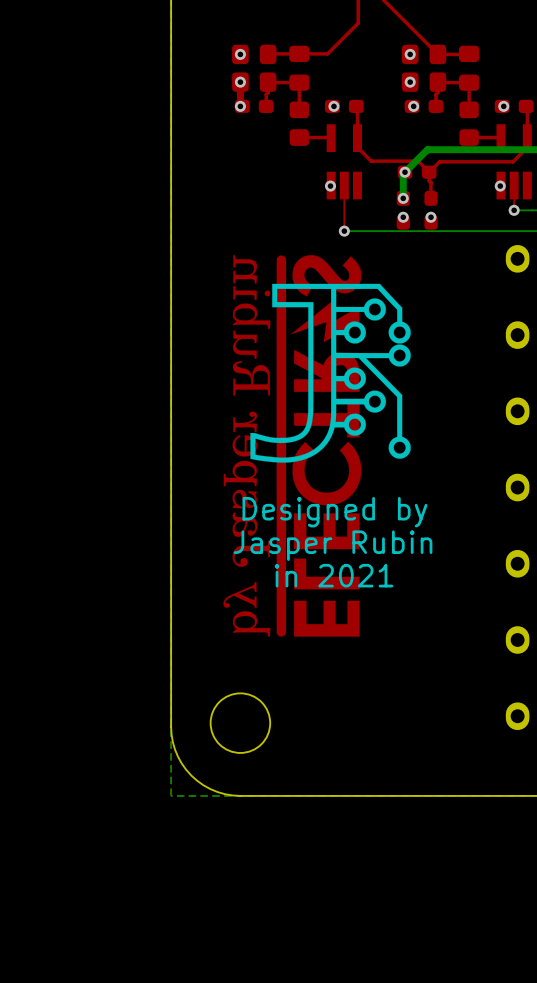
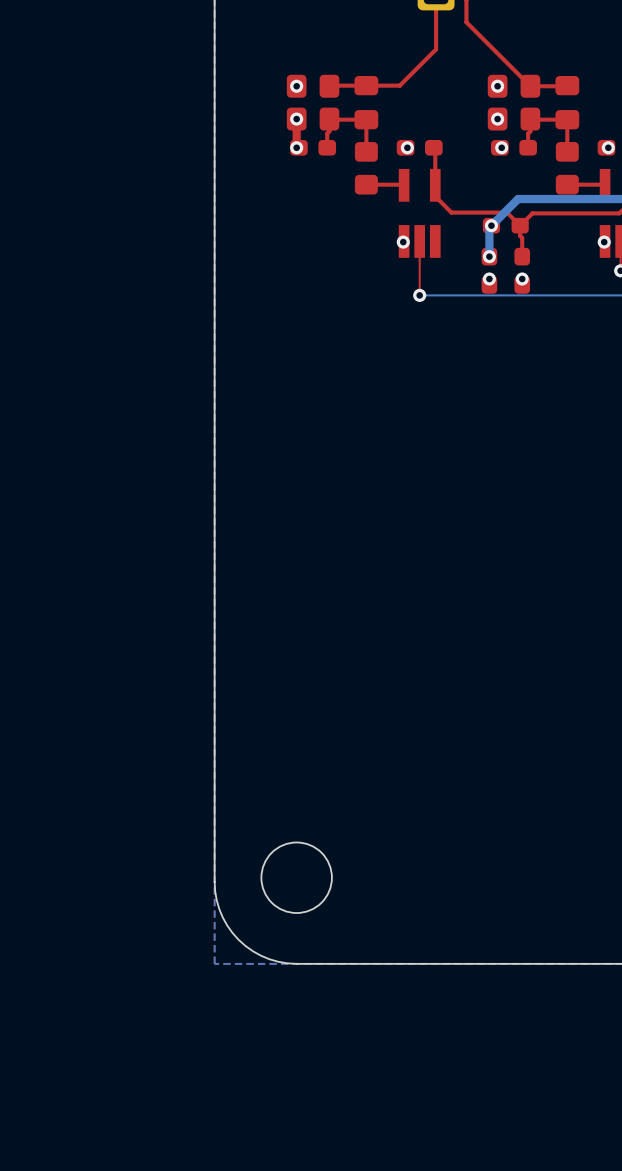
drawing: [223, 255, 411, 637] -> none
text: Designed by (334, 512) -> none
text: Jasper Rubin (332, 545) -> none
text: in 2021 (333, 575) -> none

